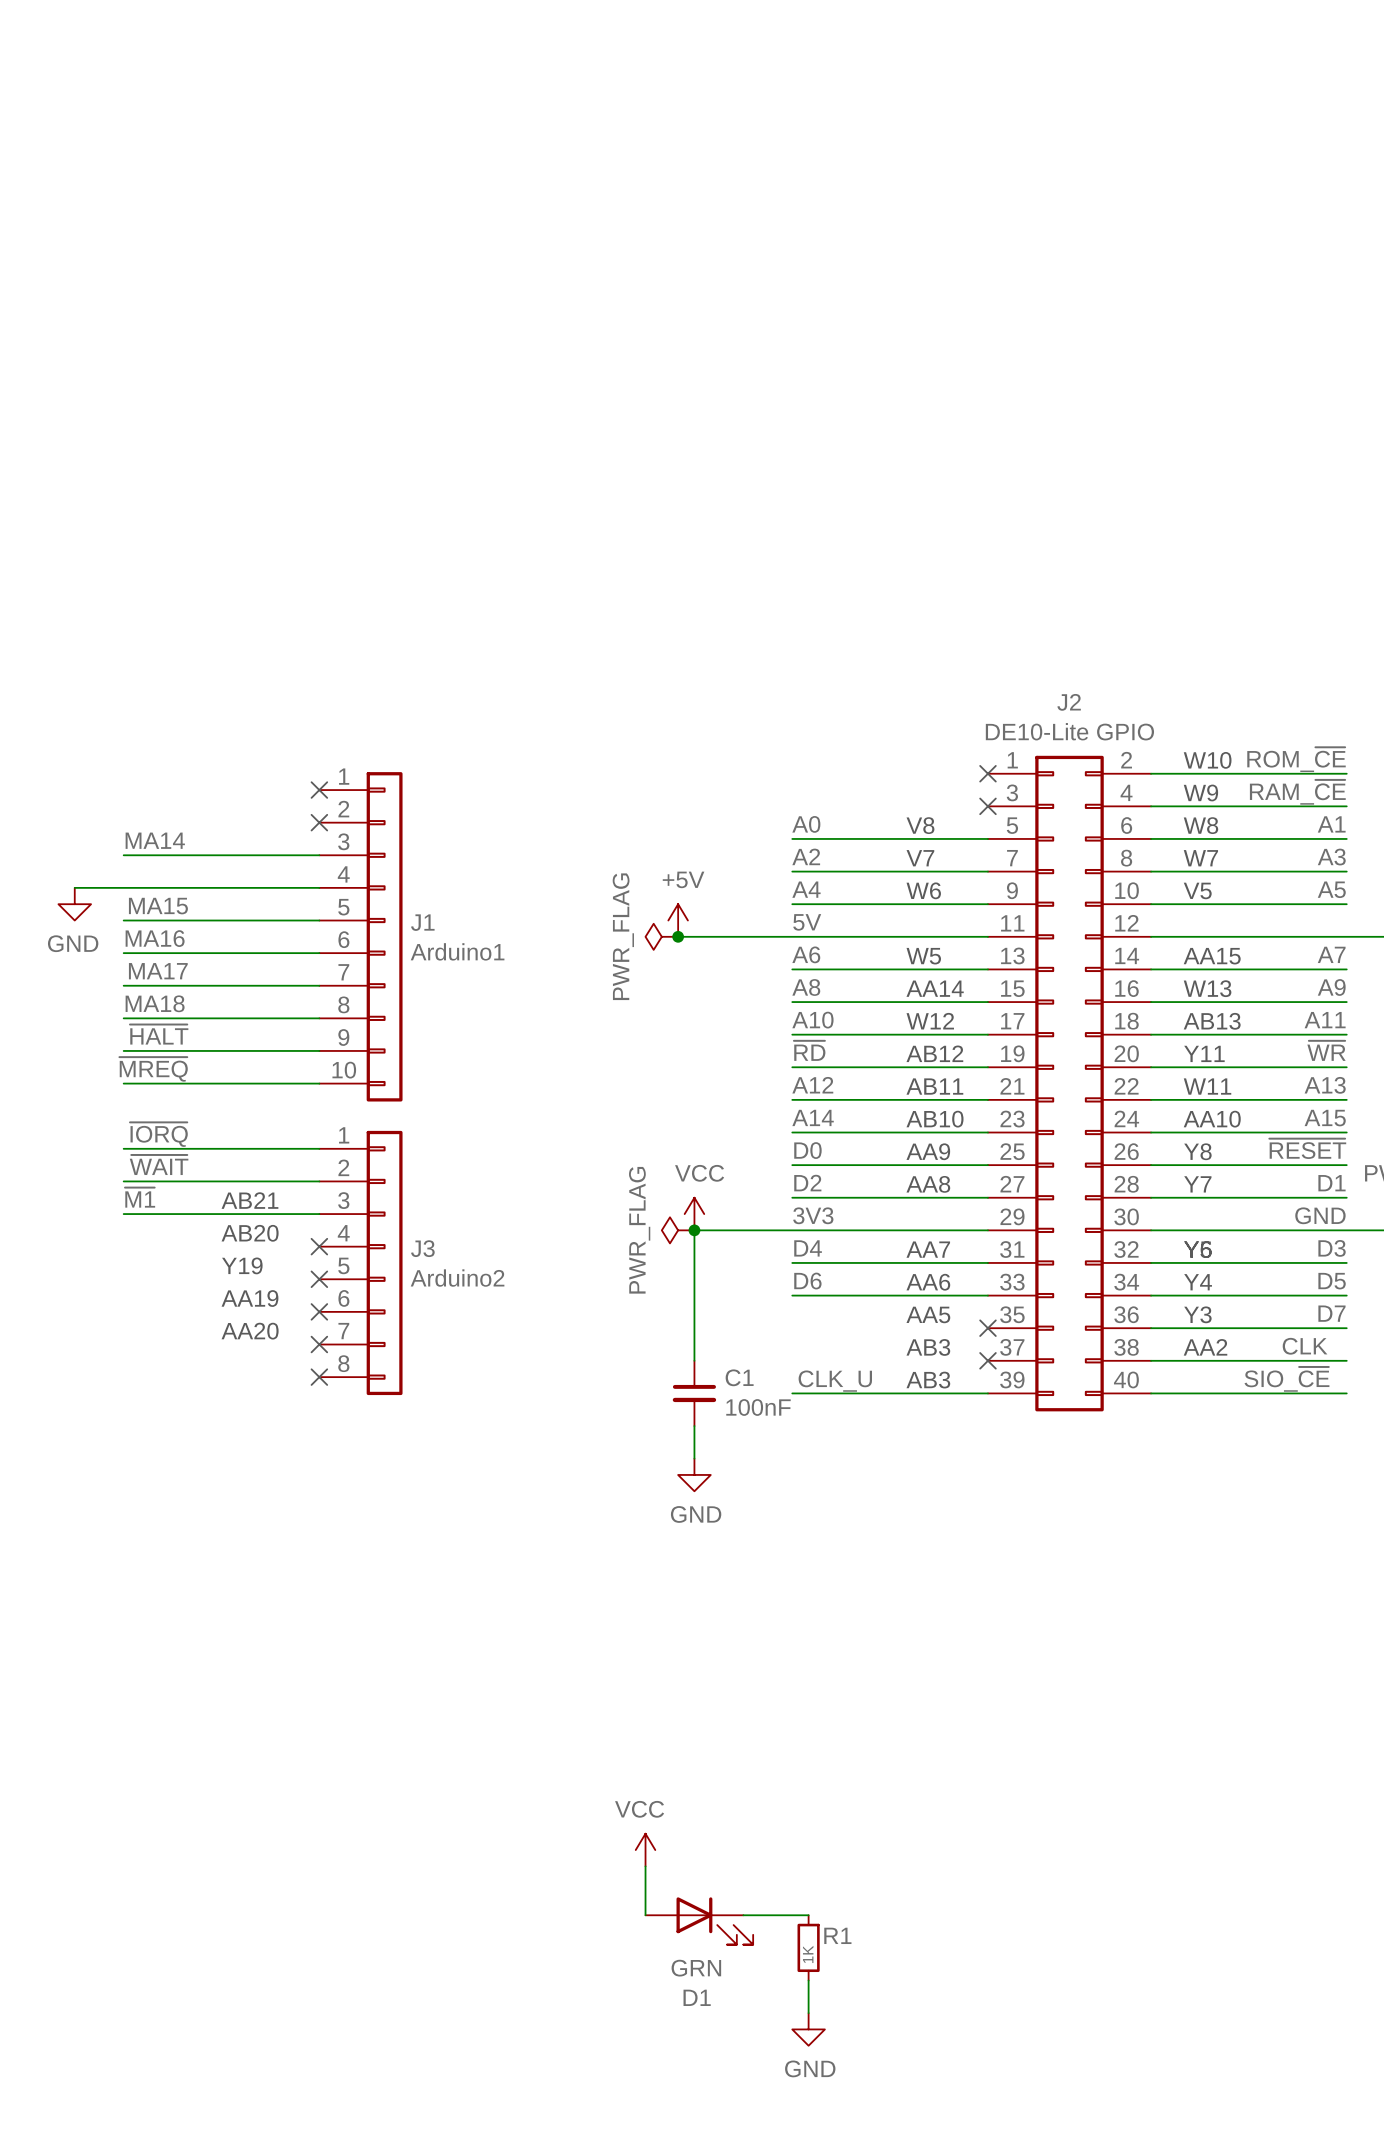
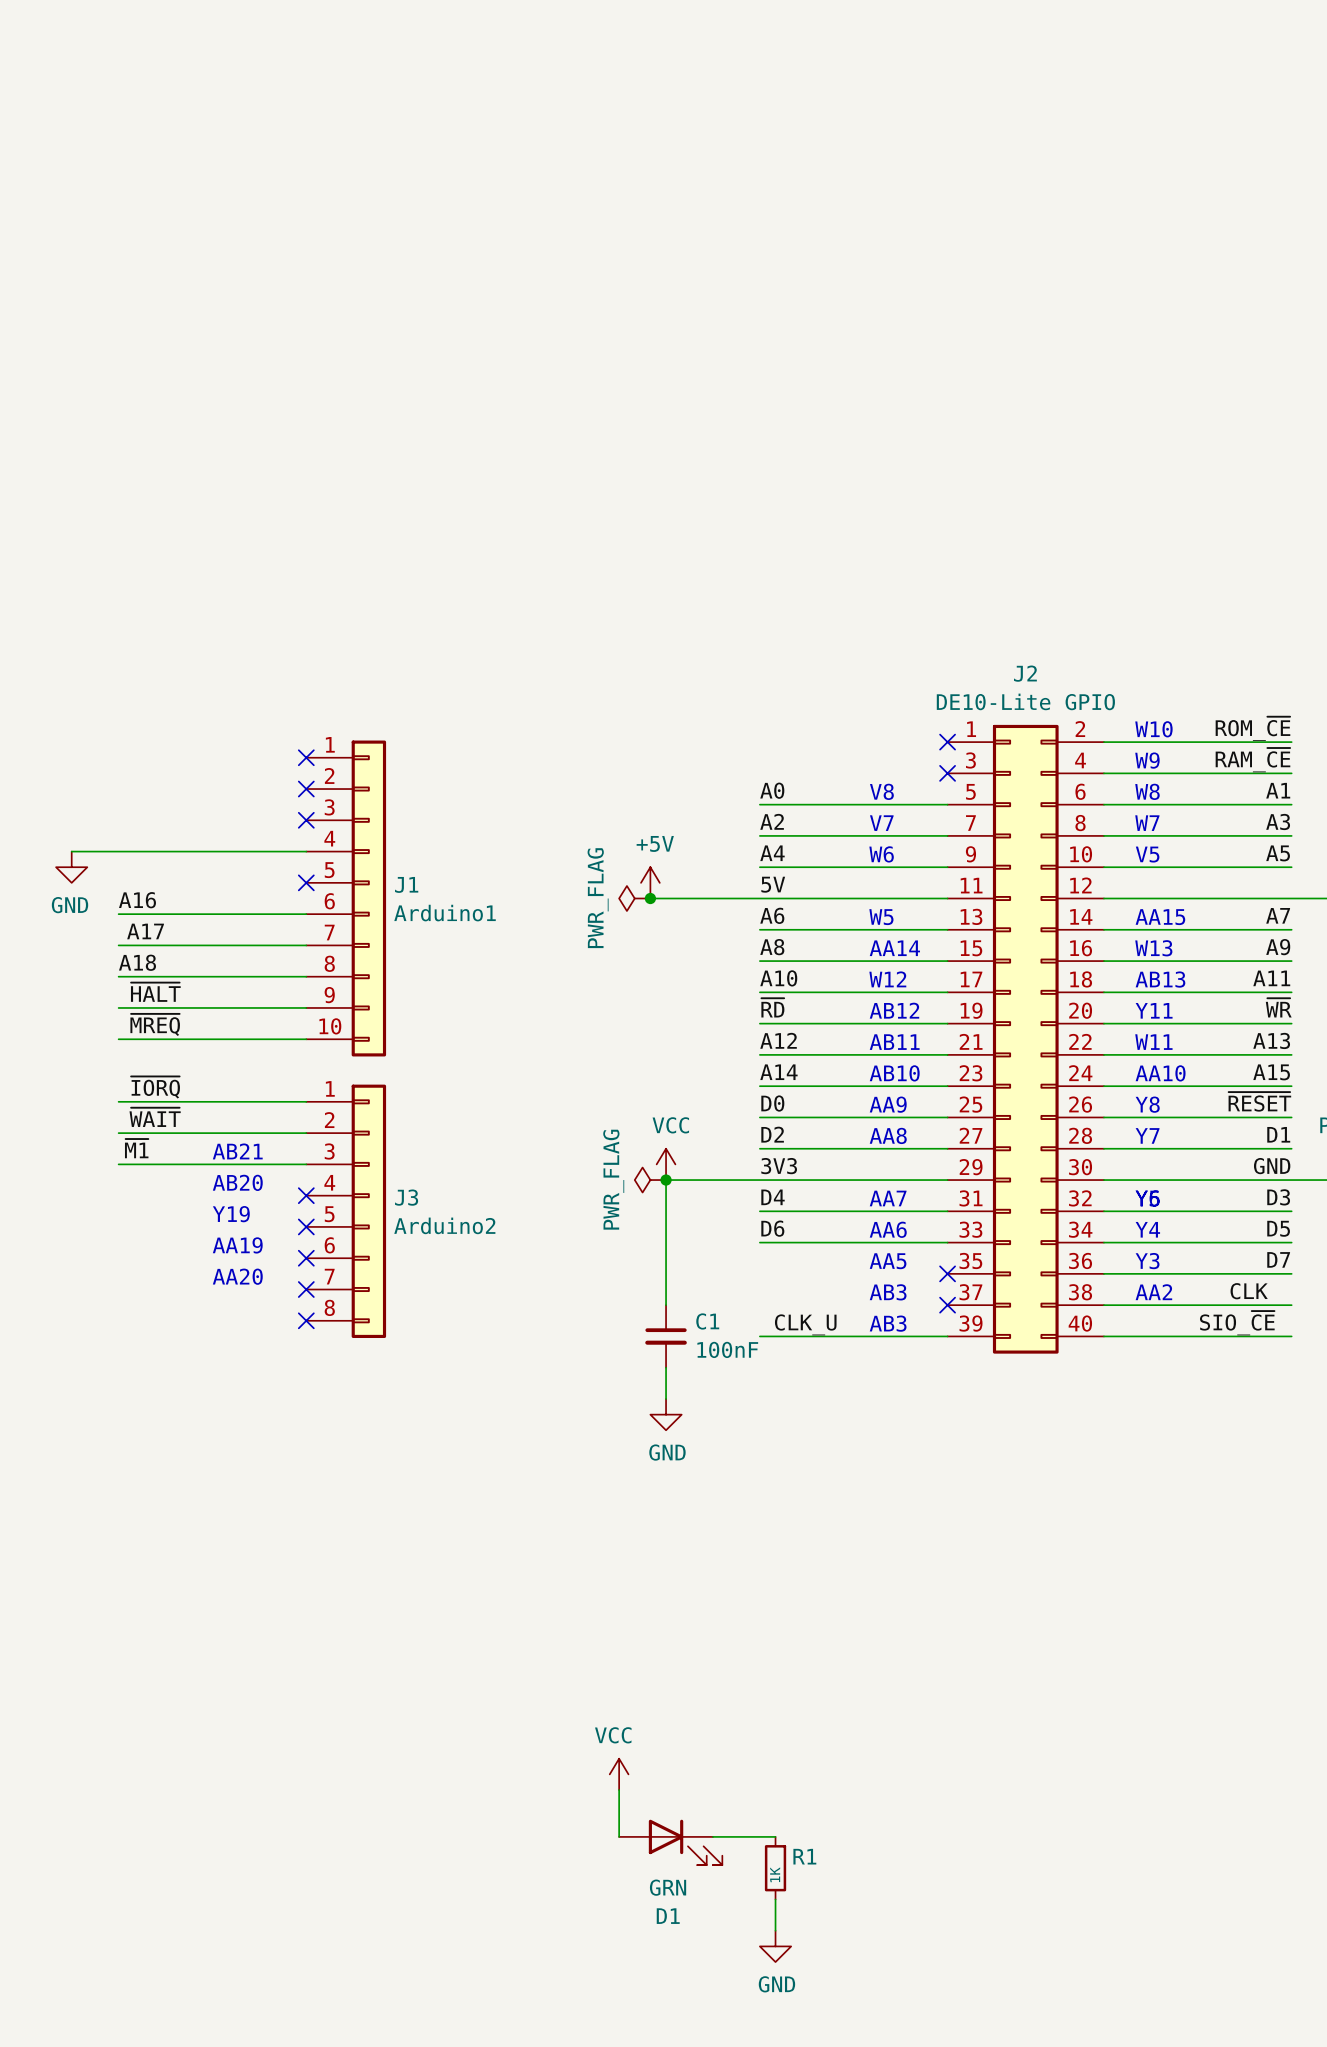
label: MA14 (155, 840) -> none
wire: (123, 855) (319, 855) -> none
no-connect mark: none -> (306, 820)
label: MA15 (158, 906) -> none
wire: (123, 920) (319, 920) -> none
no-connect mark: none -> (306, 882)
label: MA16 (155, 938) -> A16 (137, 900)
label: MA17 (158, 971) -> A17 (145, 931)
label: MA18 (155, 1003) -> A18 (137, 962)

